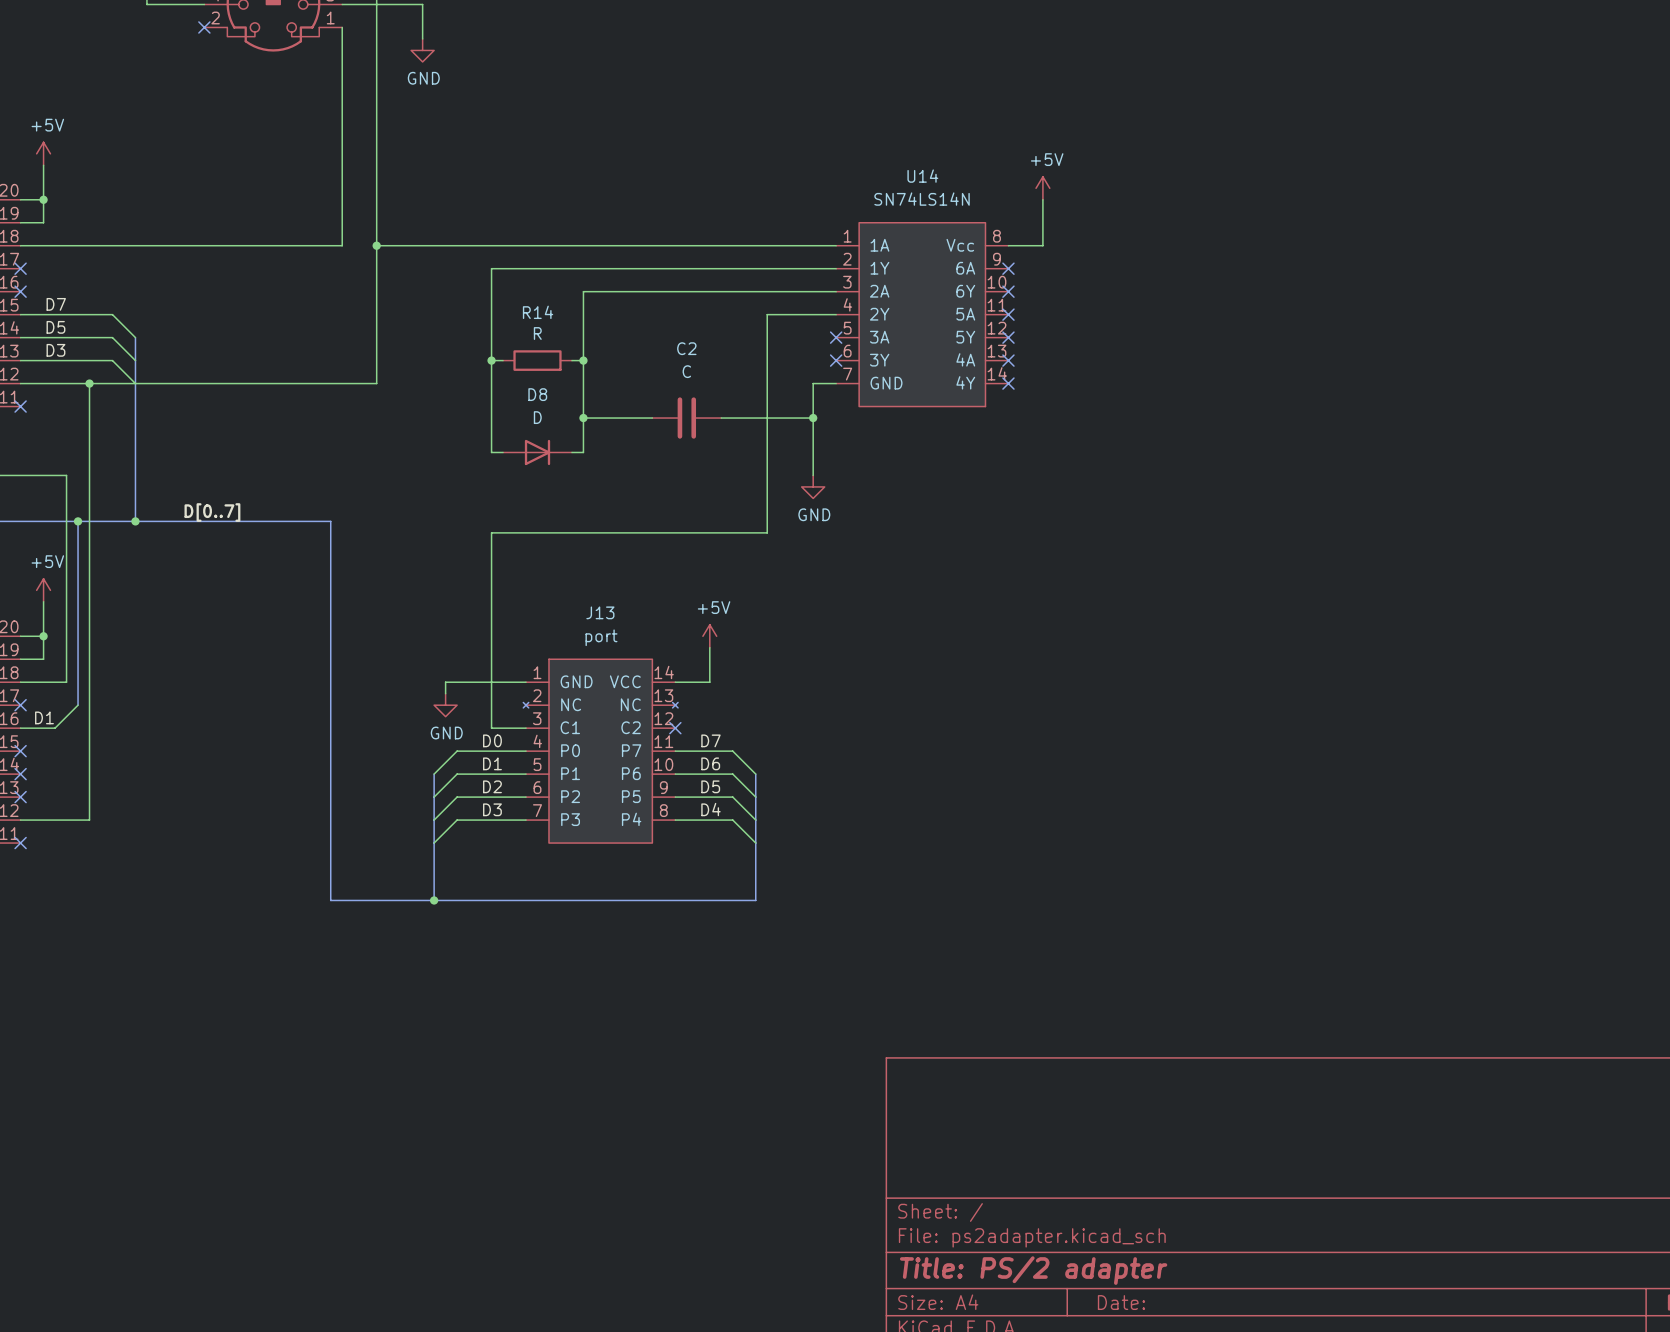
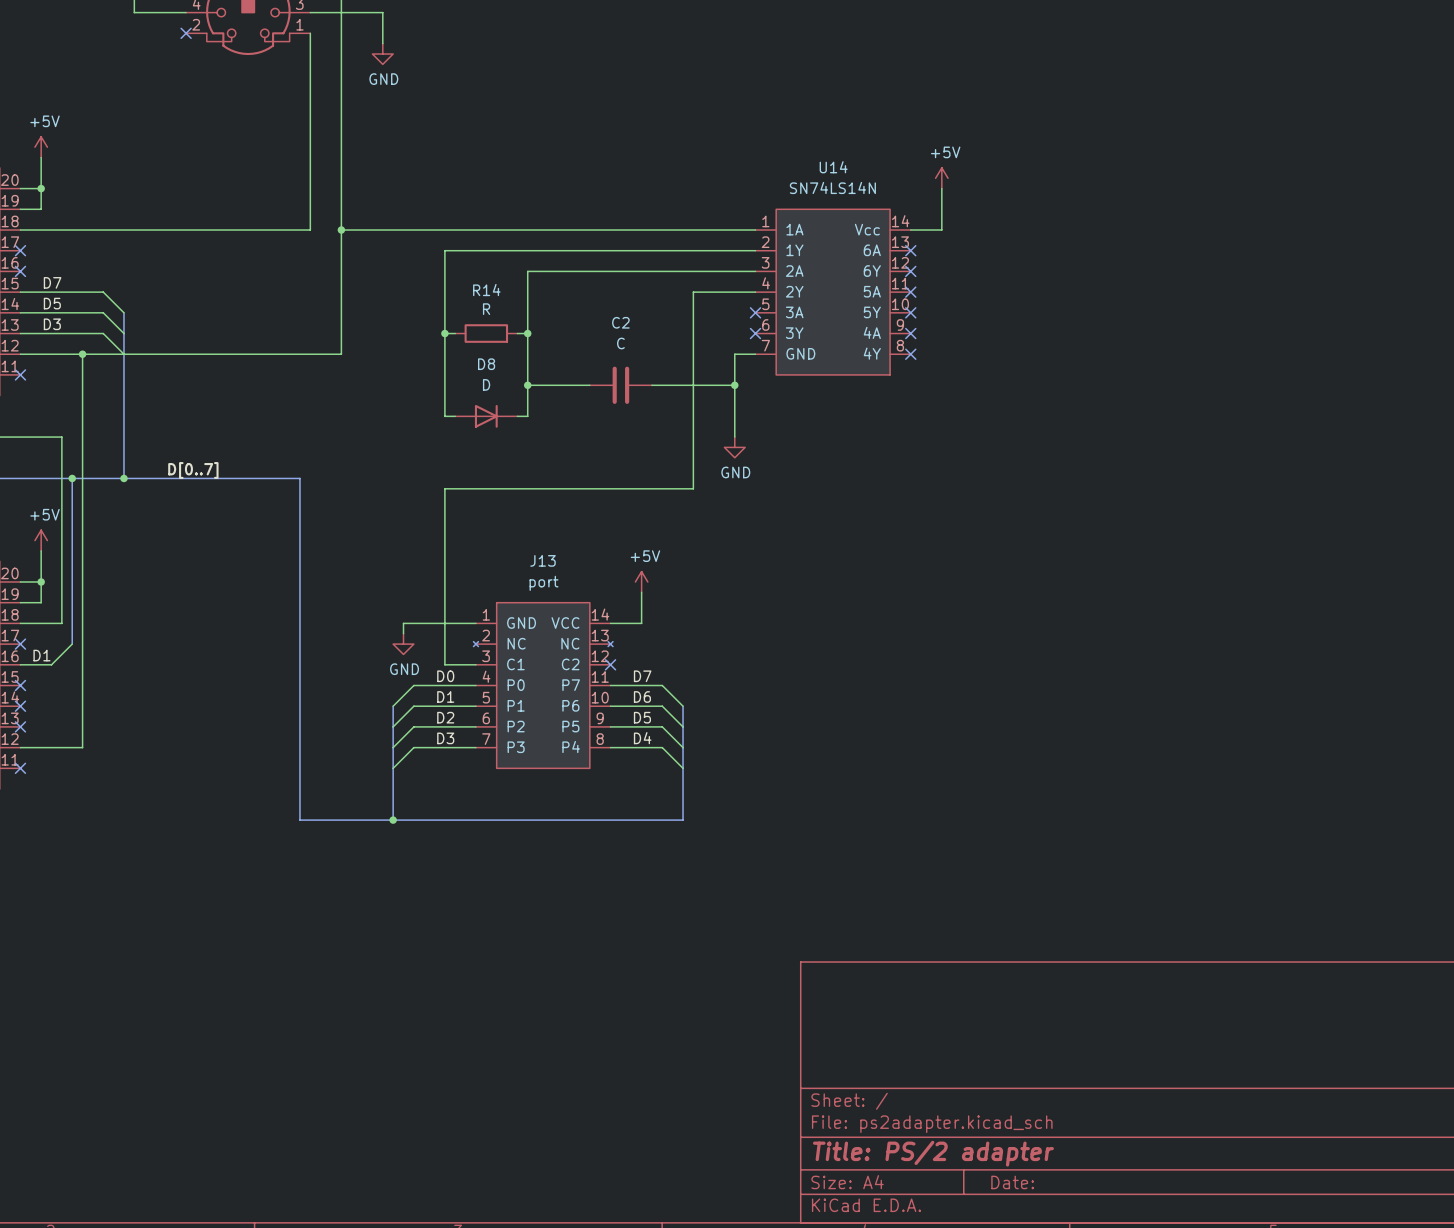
U14 pin number: 8 (996, 236) -> 14 (900, 221)
U14 pin number: 9 (996, 259) -> 13 (900, 242)
U14 pin number: 10 (996, 282) -> 12 (900, 262)
U14 pin number: 12 (996, 328) -> 10 (900, 304)
U14 pin number: 13 (996, 351) -> 9 (900, 324)
U14 pin number: 14 (997, 373) -> 8 (900, 345)

